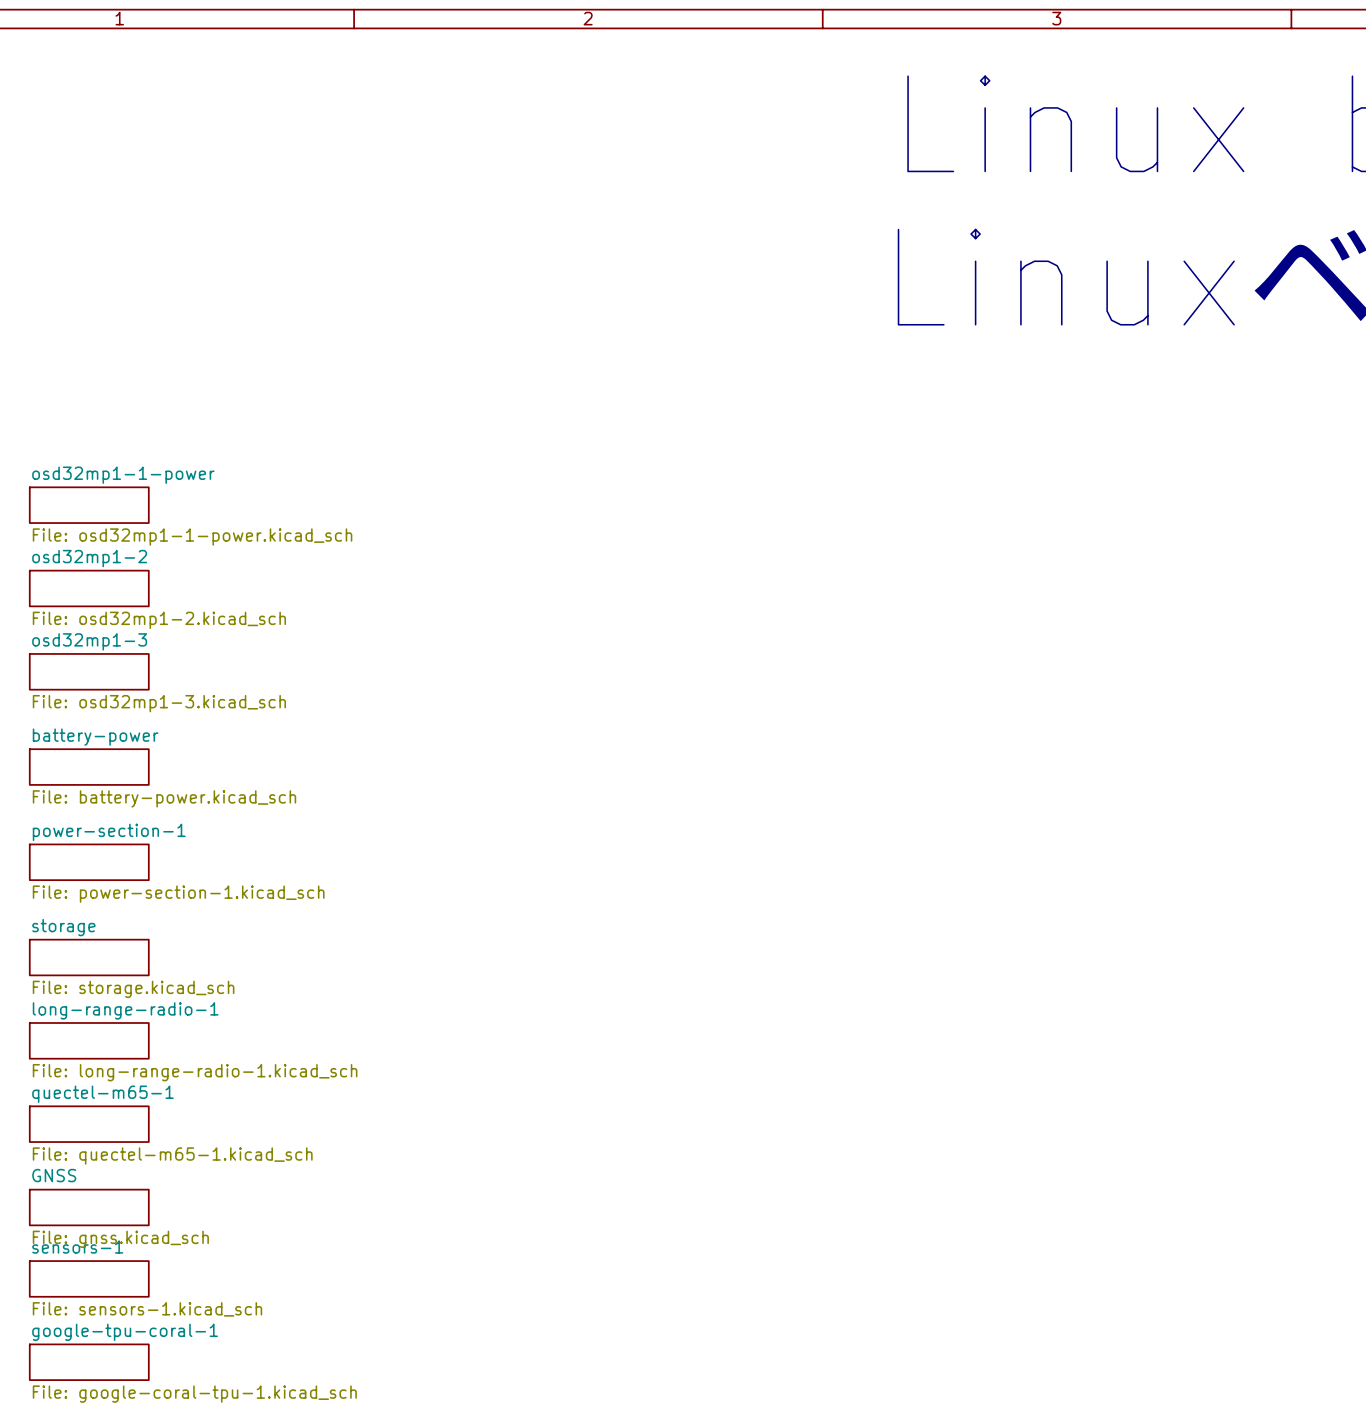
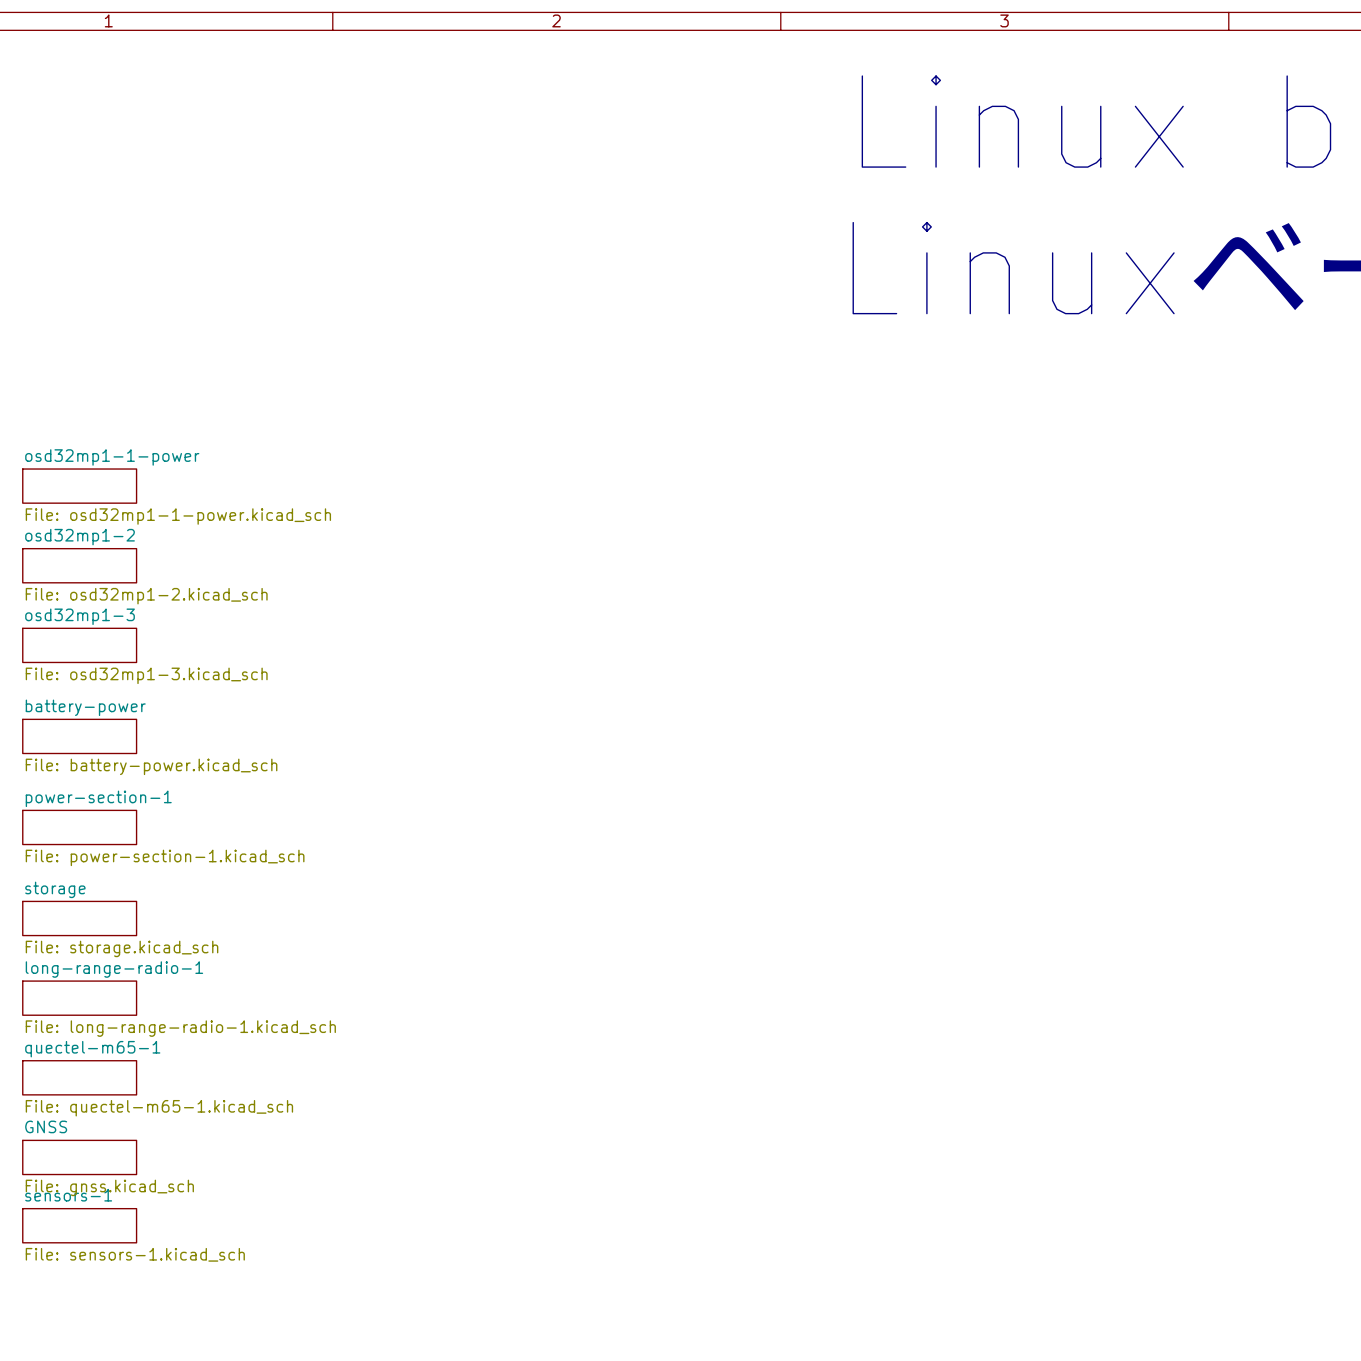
sheet google-tpu-coral-1: File: google-coral-tpu-1.kicad_sch (89, 1362) -> none

